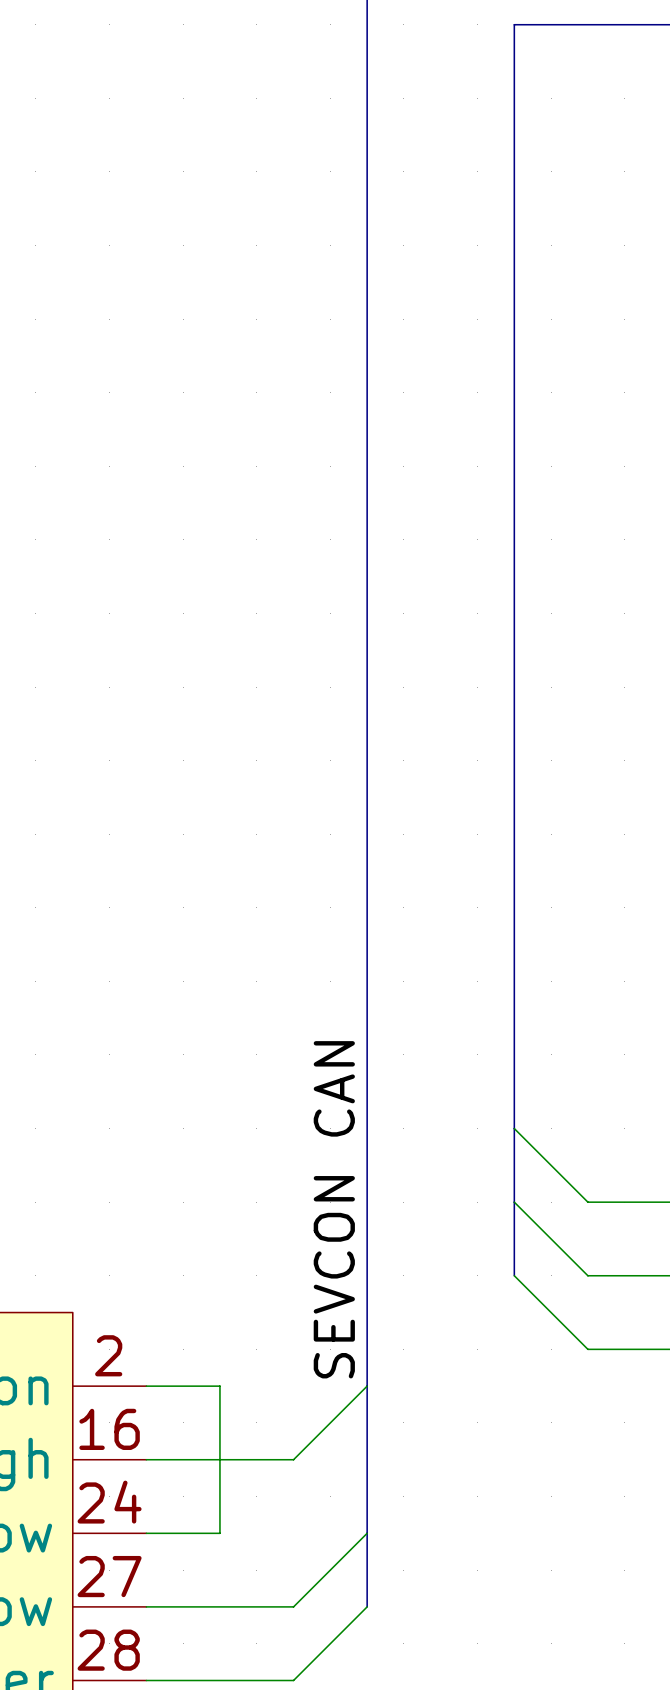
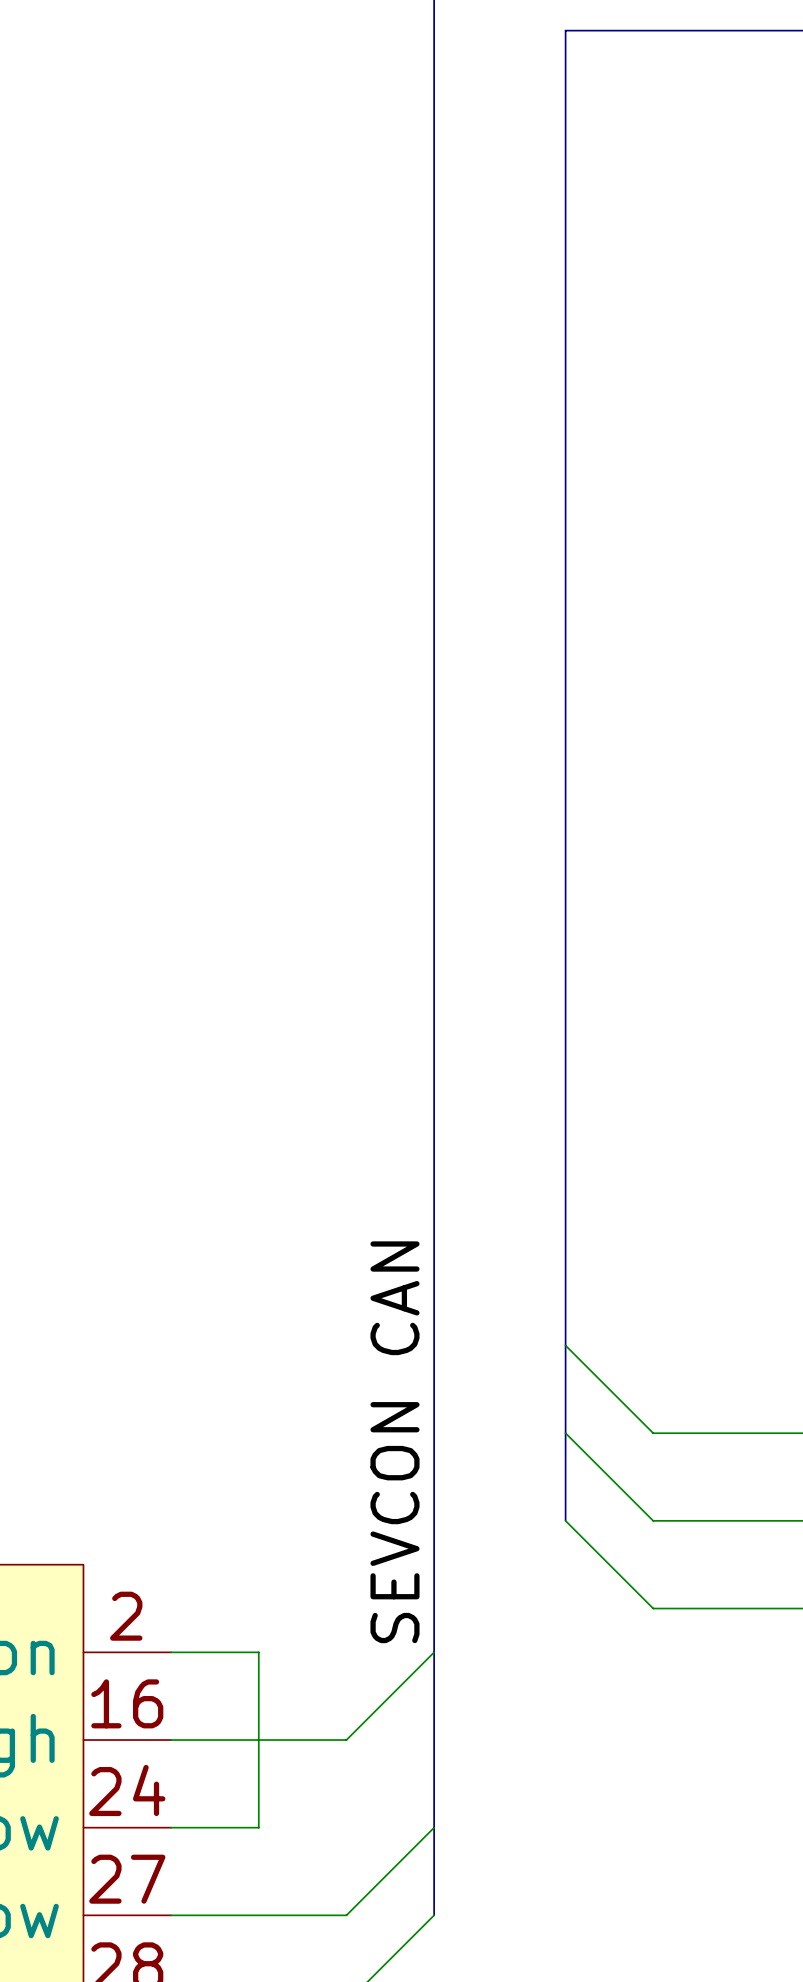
bus: (514, 24) (514, 1275) -> (609, 30) (565, 30) (565, 1520)
wire: (514, 1128) (587, 1202) -> (565, 1345) (653, 1433) (697, 1433)
wire: (514, 1202) (587, 1275) -> (565, 1433) (653, 1520) (697, 1520)
wire: (514, 1275) (587, 1349) -> (565, 1520) (653, 1608) (697, 1608)

